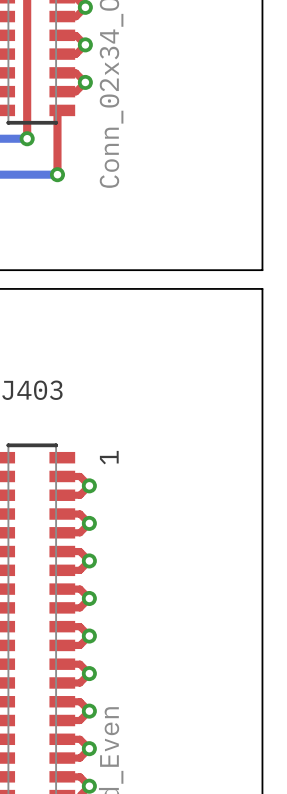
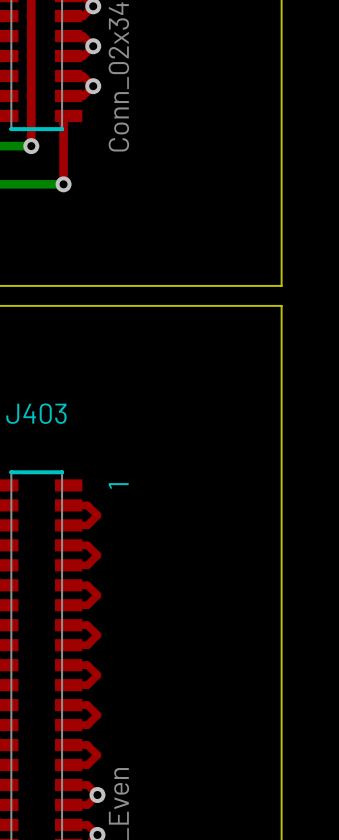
via: (89, 485) -> none
via: (89, 523) -> none
via: (89, 560) -> none
via: (89, 598) -> none
via: (89, 636) -> none
via: (89, 673) -> none
via: (89, 711) -> none

